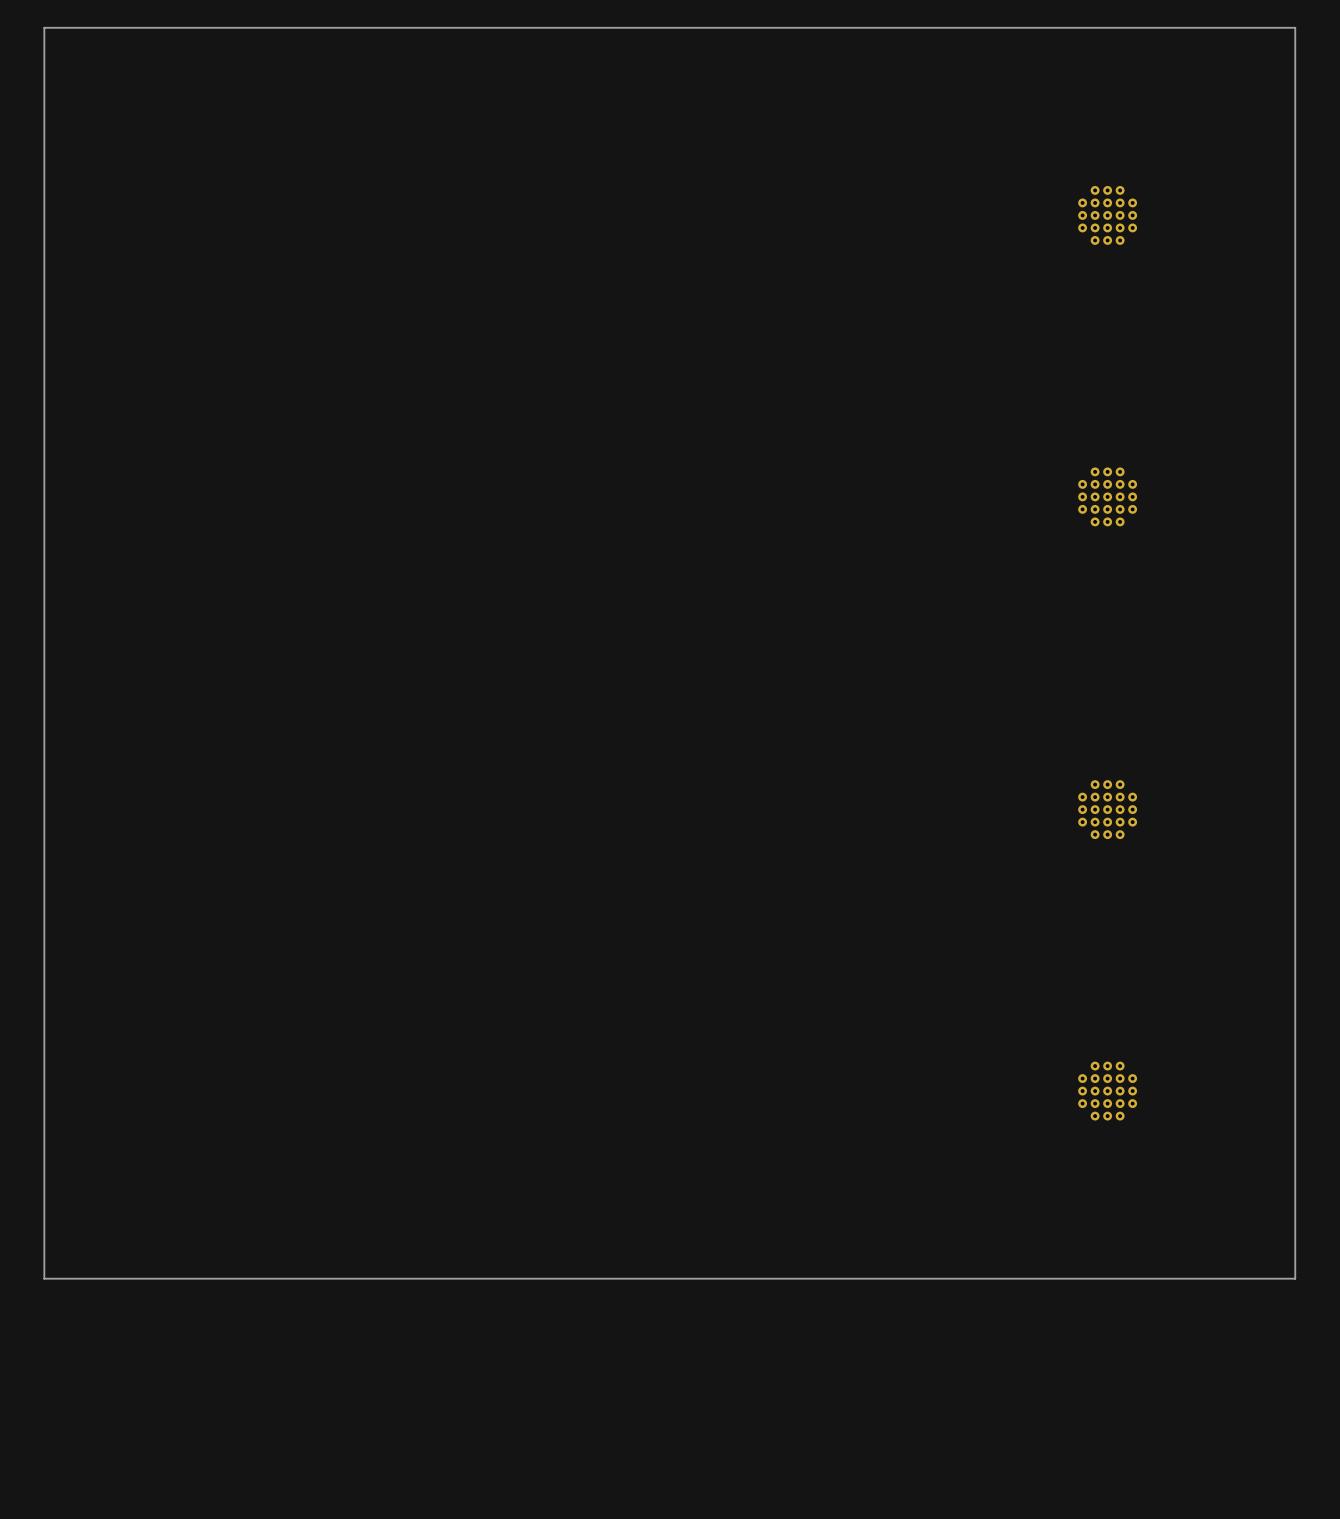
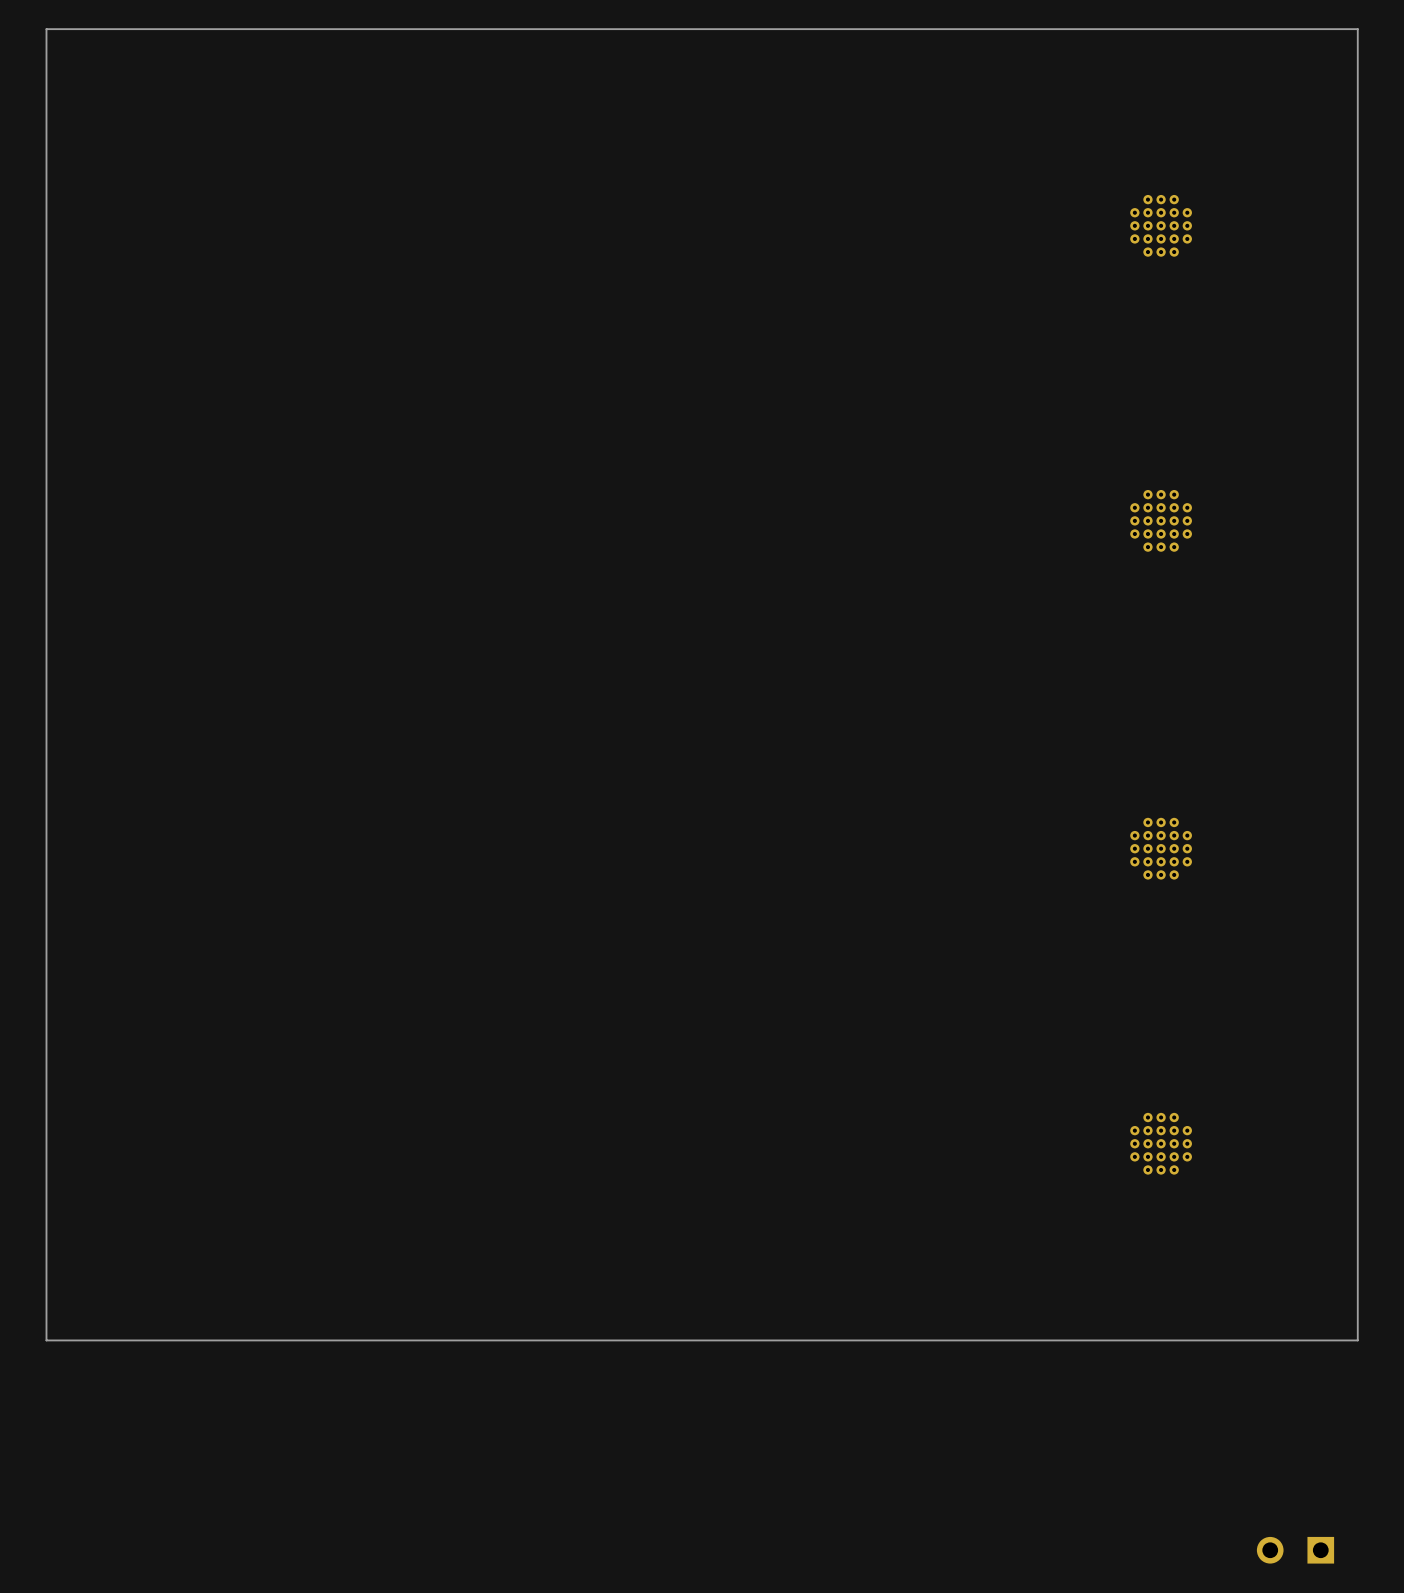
part: none -> (1295, 1550)

